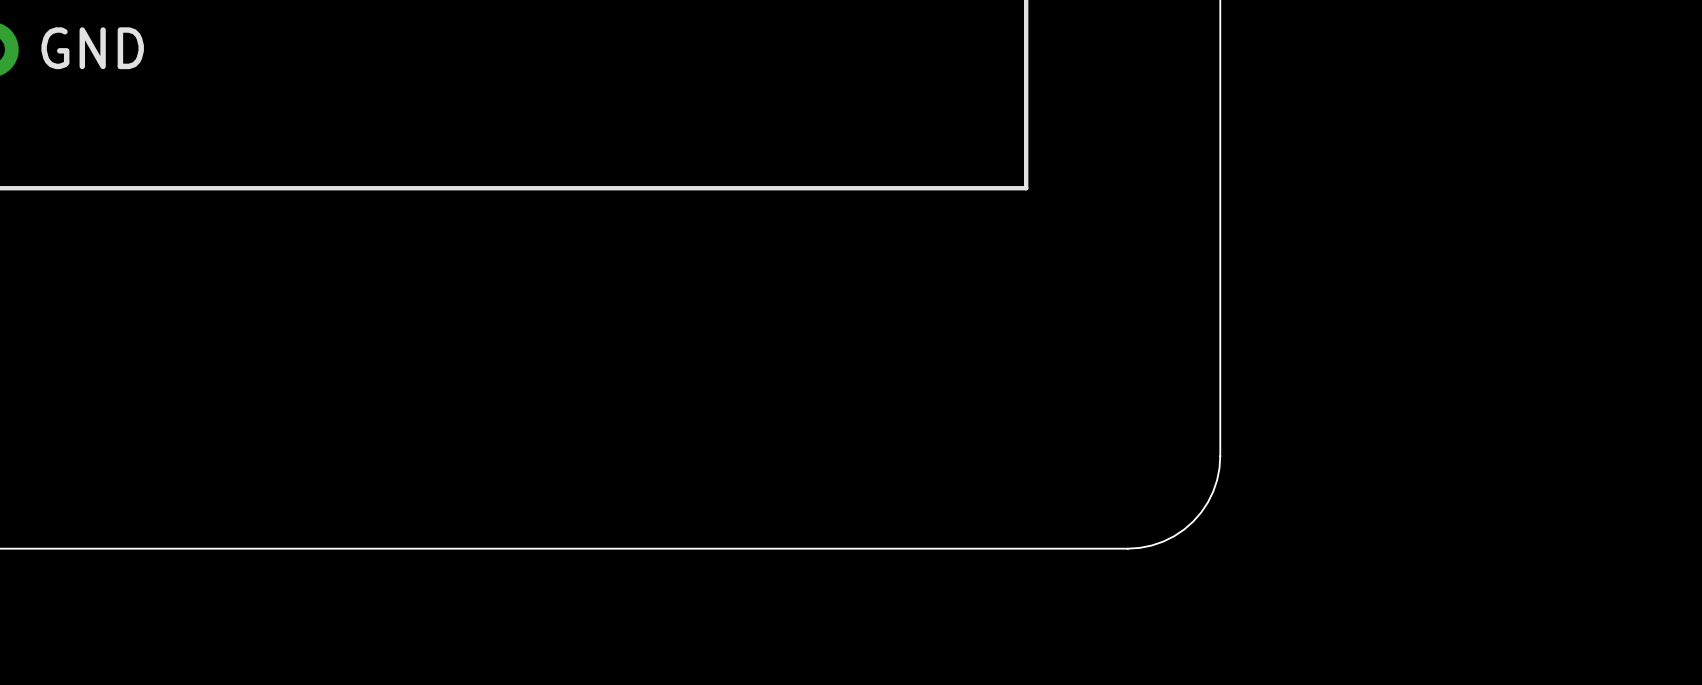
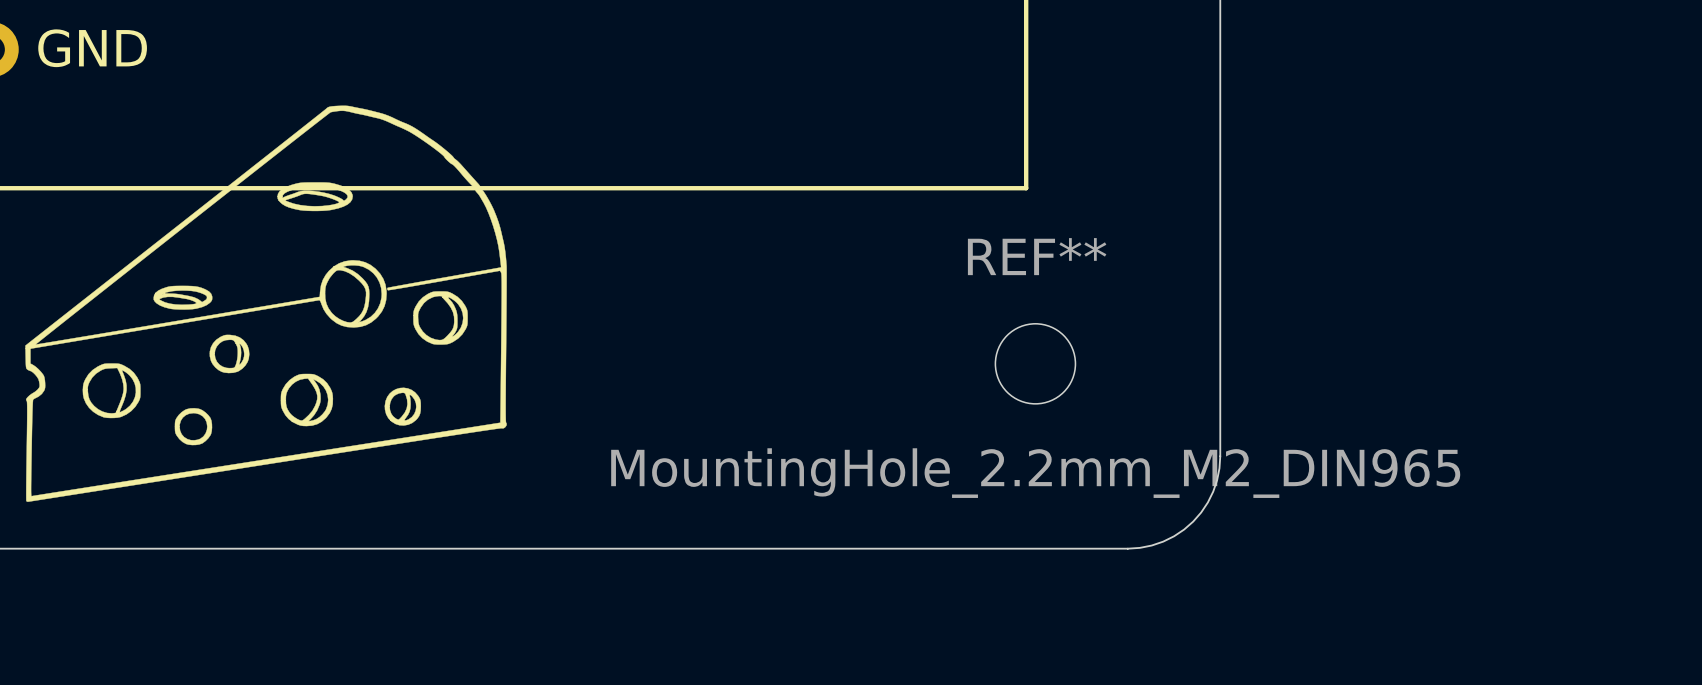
drawing: none -> [25, 105, 507, 502]
REF**: none -> MountingHole_2.2mm_M2_DIN965 (1035, 363)

